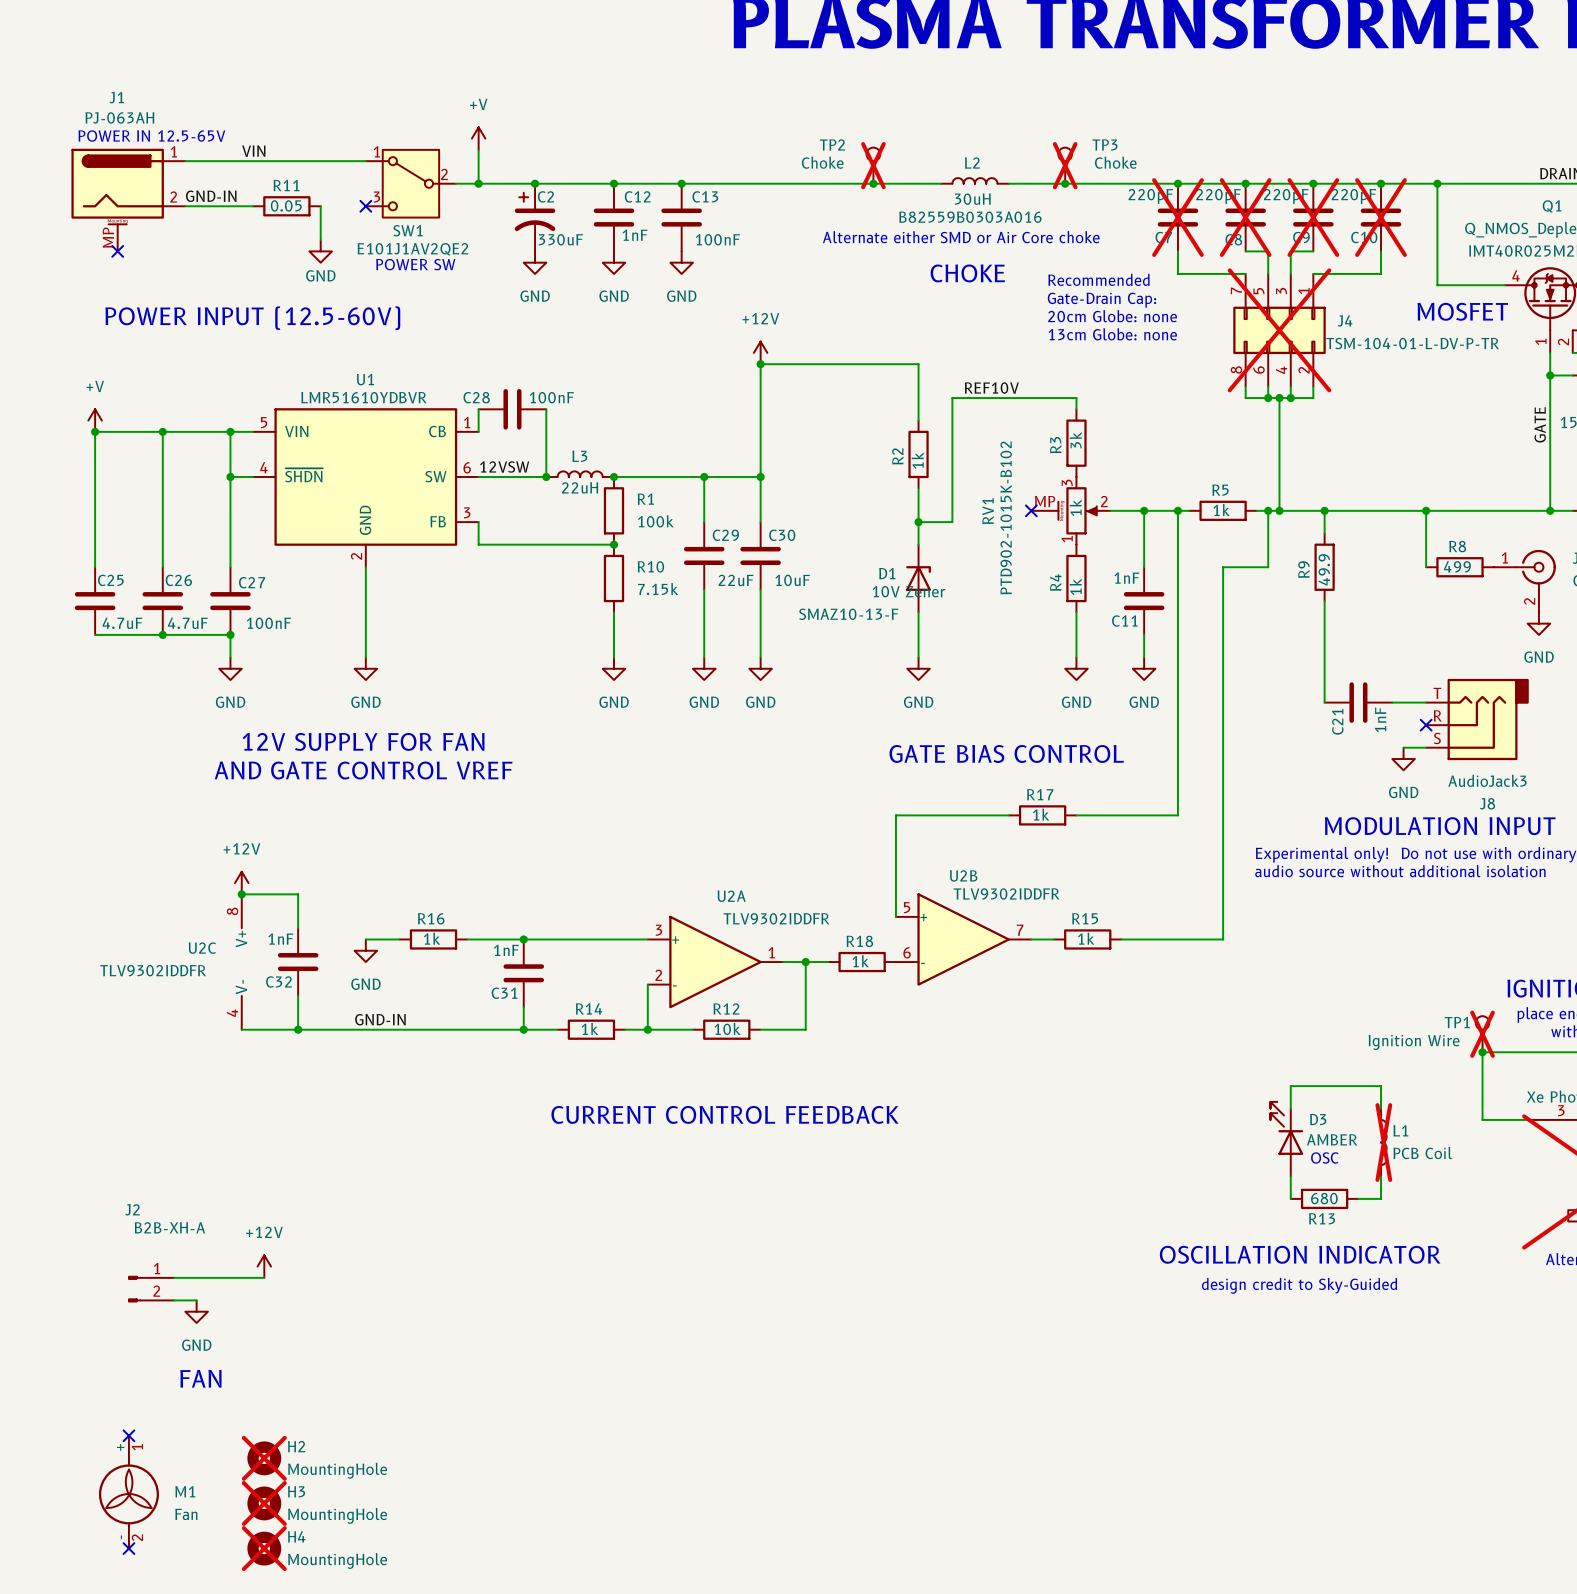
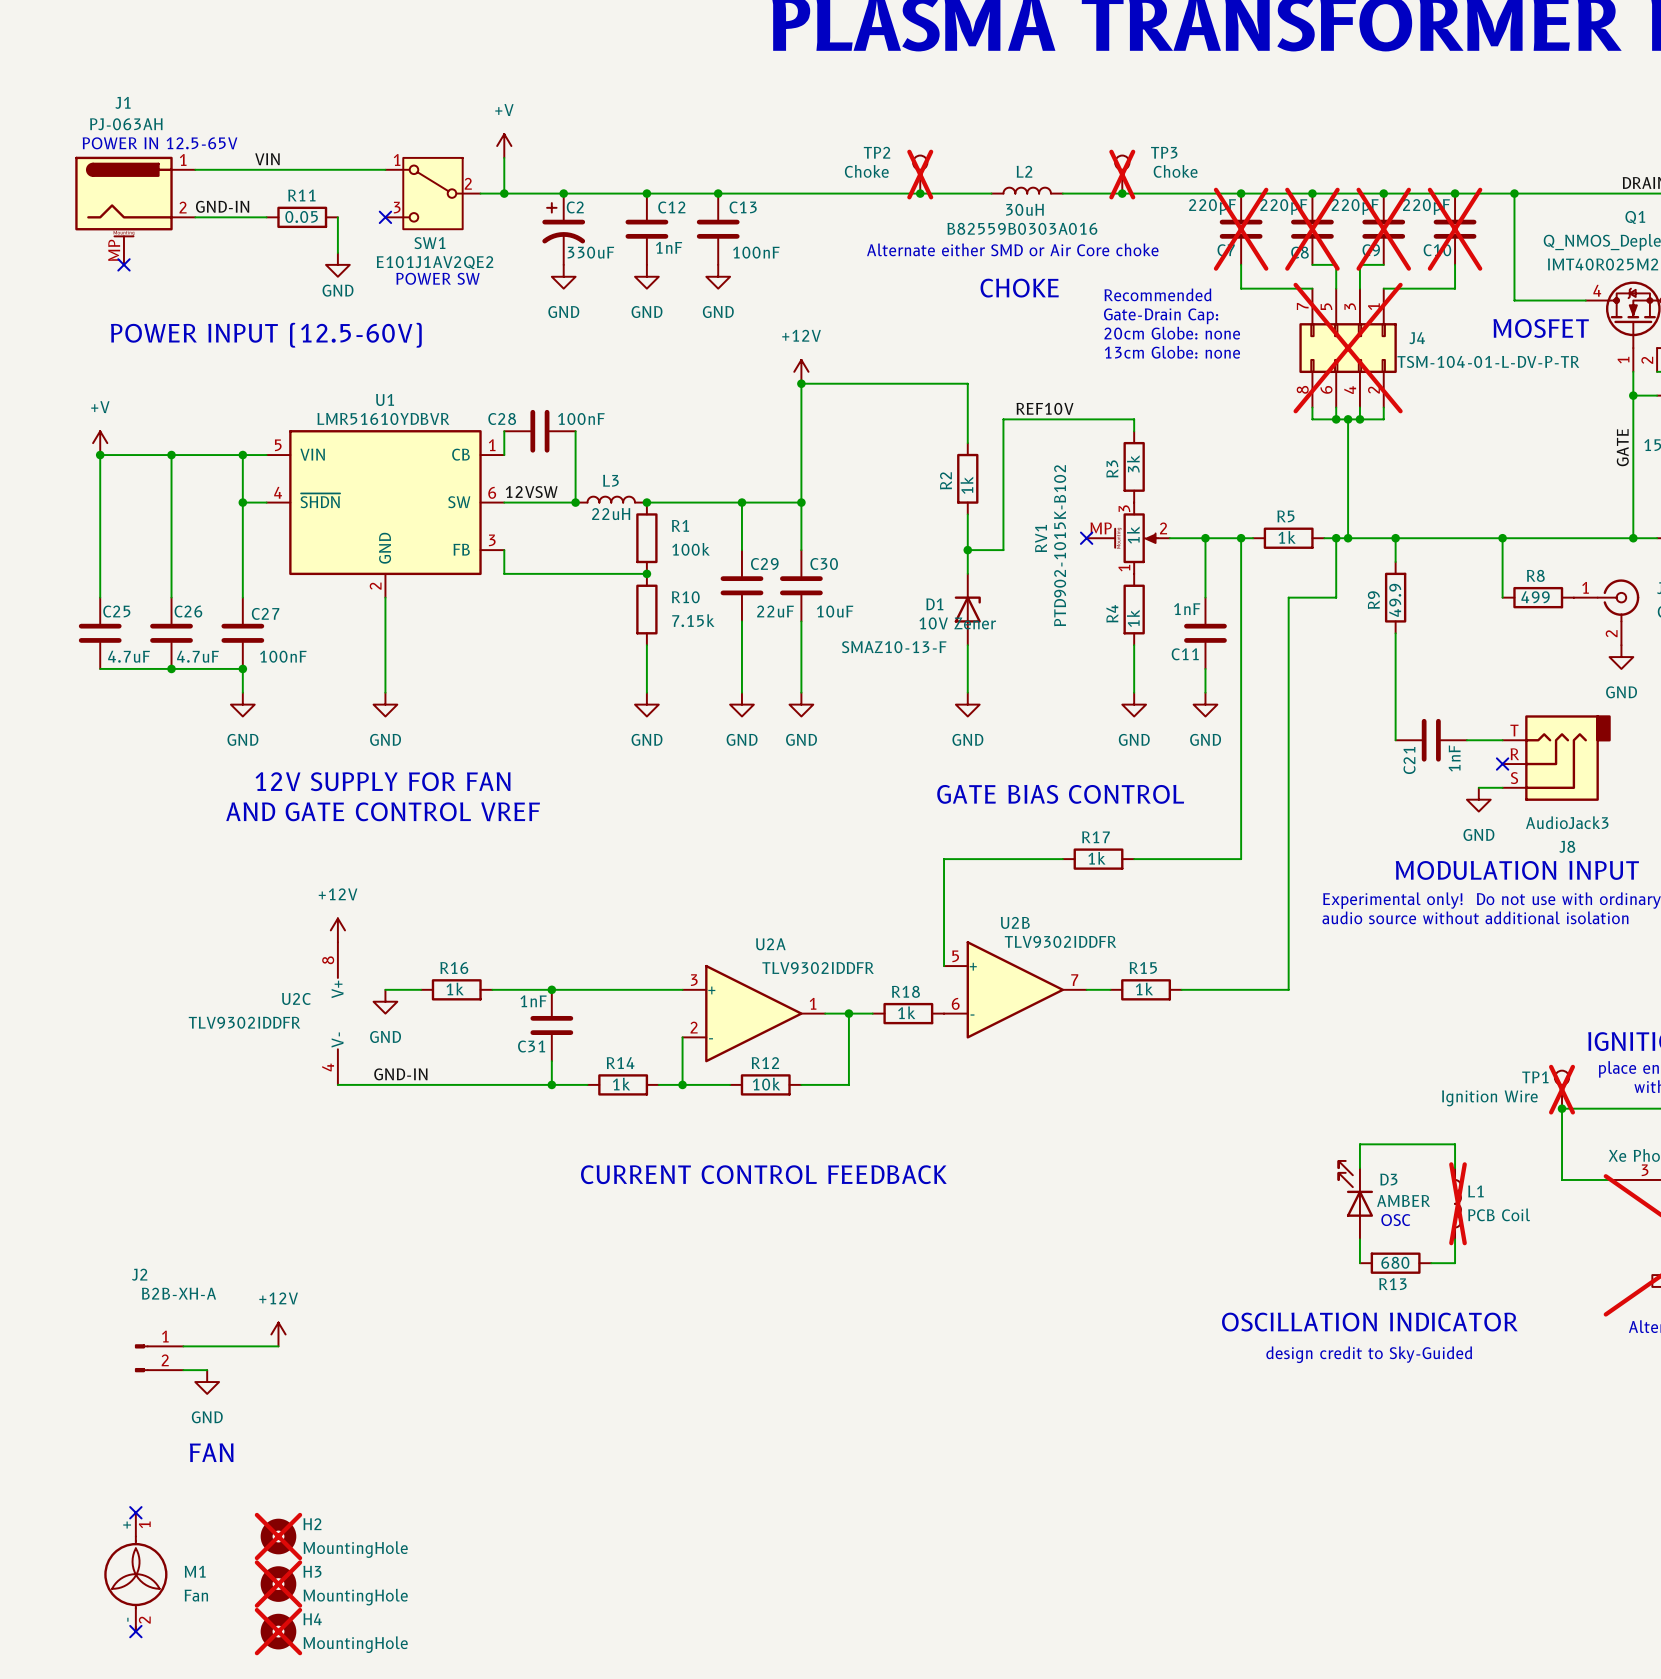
power symbol position: +12V (241, 883) -> +12V (337, 930)
wire: (241, 894) (298, 894) (298, 928) -> none
junction: (241, 894) -> none
U2C position: (241, 962) -> (337, 1013)
C32: 1nF (298, 962) -> none
wire: (298, 995) (298, 1029) -> none
wire: (241, 1029) (320, 1029) -> none
junction: (298, 1029) -> none

